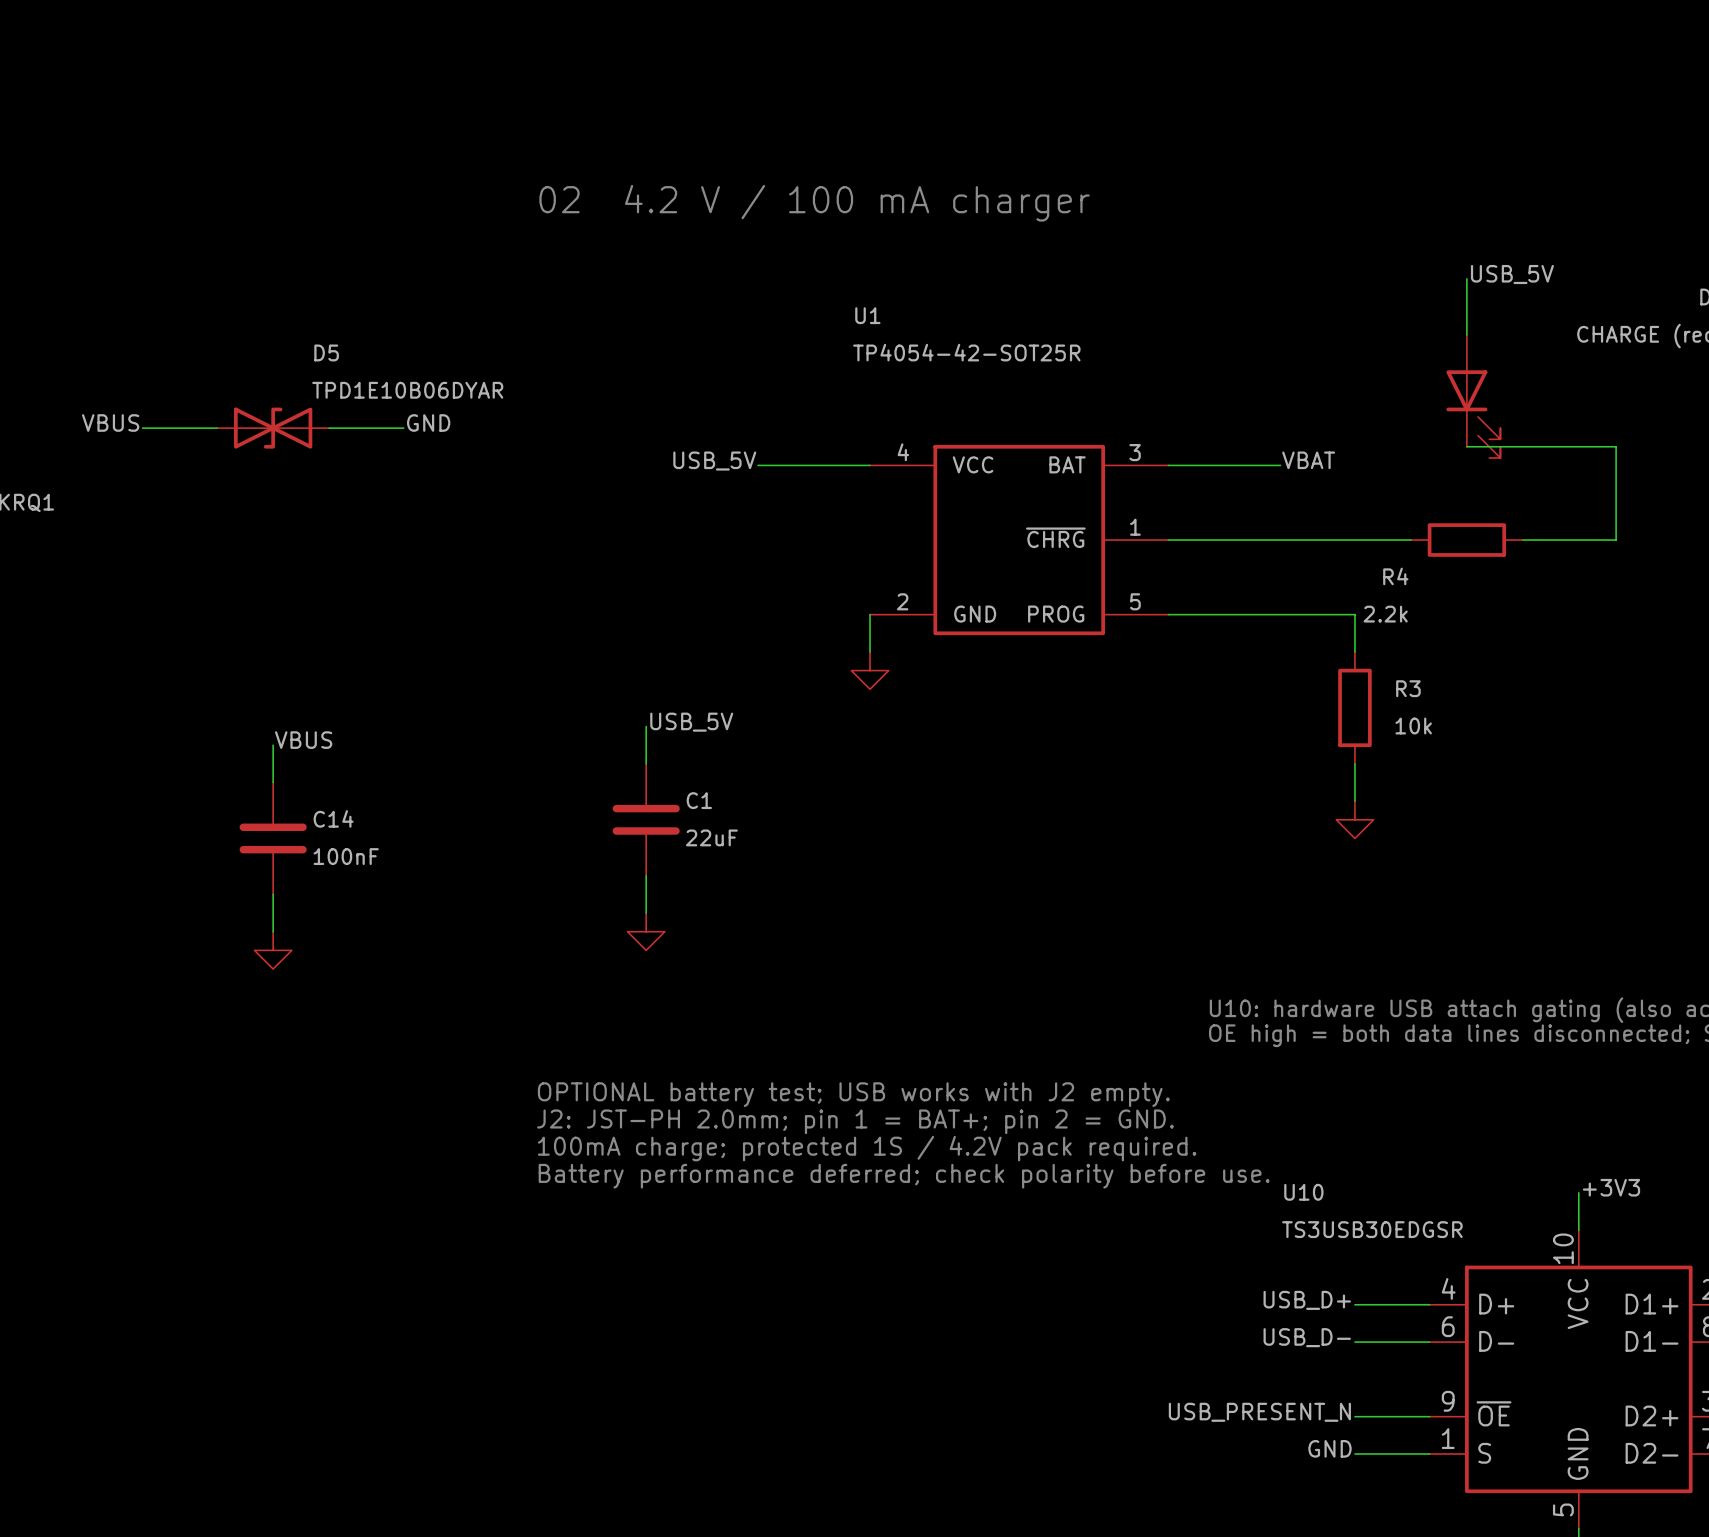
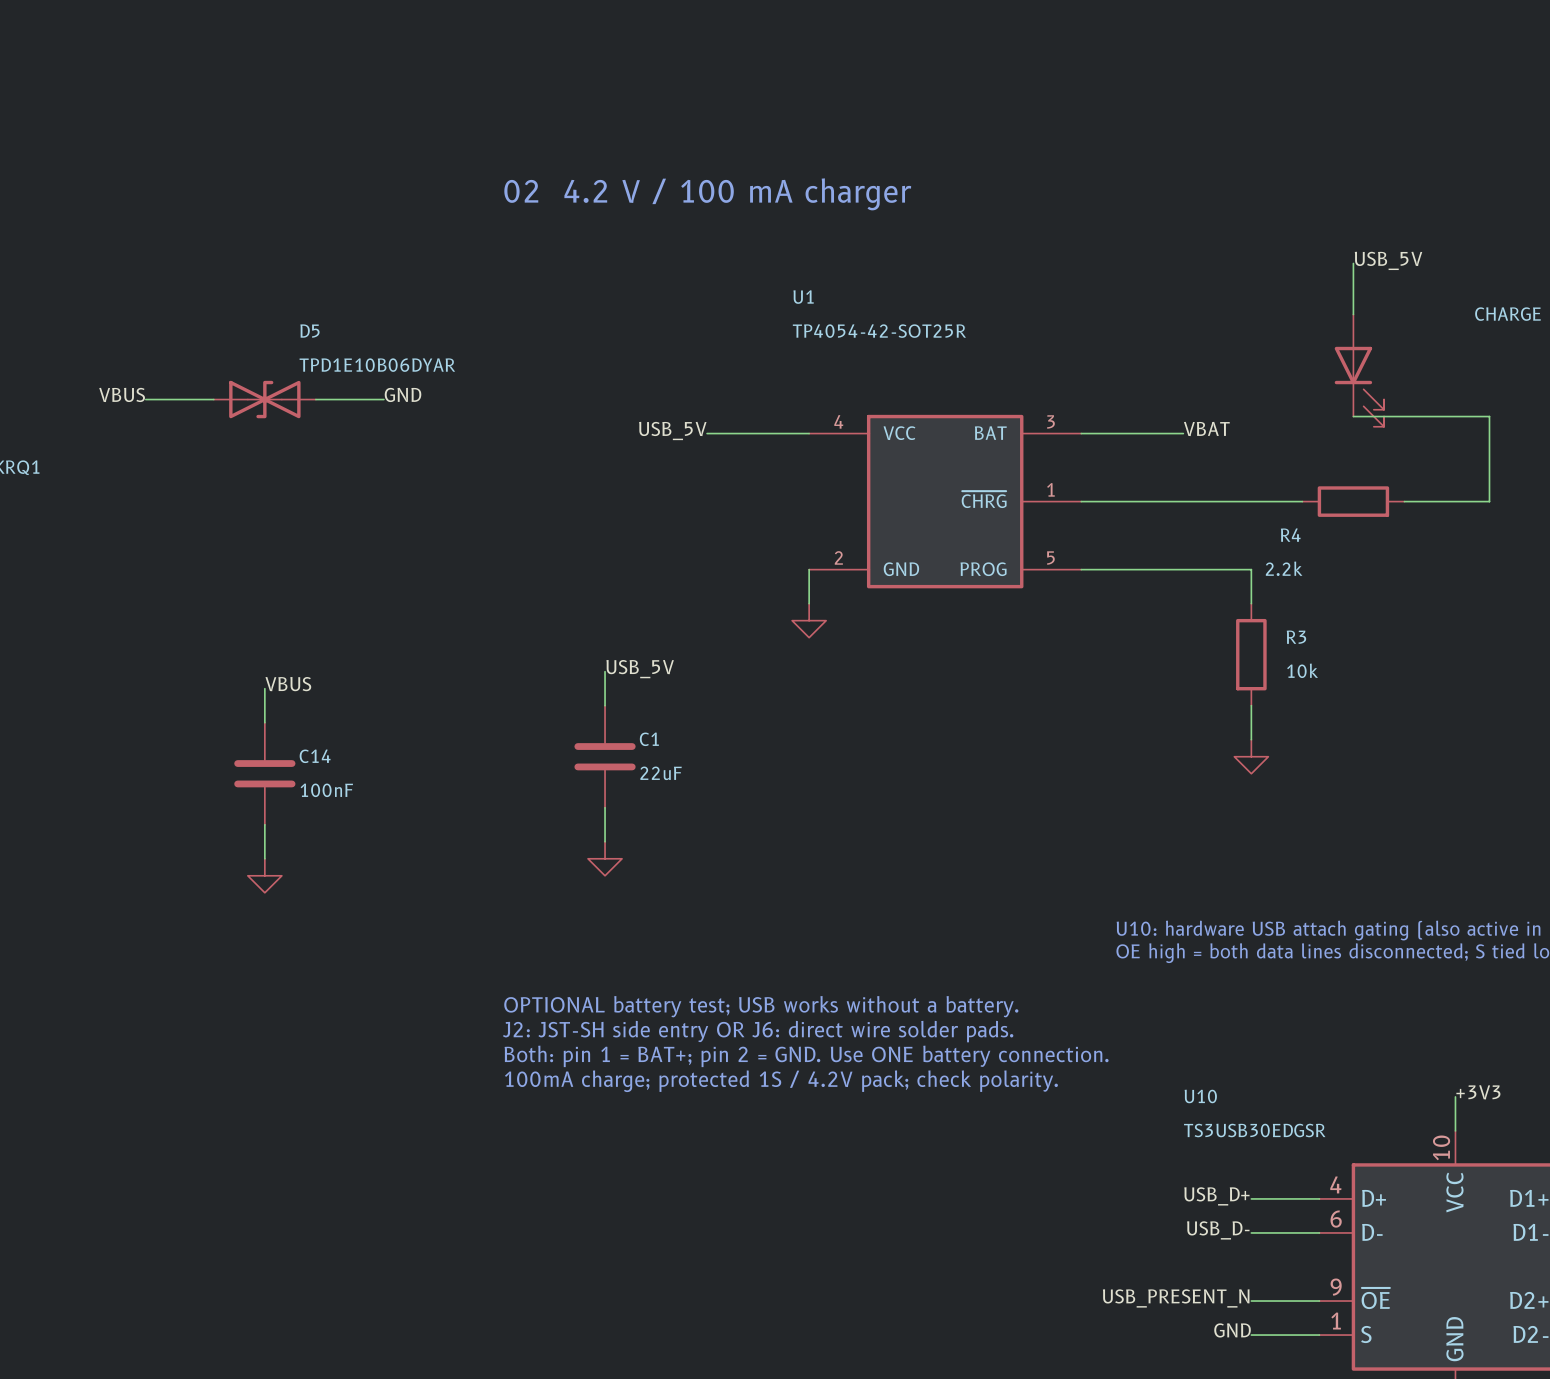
text: OPTIONAL battery test; USB works with J2 empty. (853, 1094) -> OPTIONAL battery test; USB works without a battery. (761, 1006)
text: J2: JST-PH 2.0mm; pin 1 = BAT+; pin 2 = GND. (855, 1121) -> J2: JST-SH side entry OR J6: direct wire solder pads. (758, 1031)
text: 100mA charge; protected 1S / 4.2V pack required. (867, 1148) -> Both: pin 1 = BAT+; pin 2 = GND. Use ONE battery connection. (806, 1056)
text: Battery performance deferred; check polarity before use. (904, 1176) -> 100mA charge; protected 1S / 4.2V pack; check polarity. (781, 1081)

